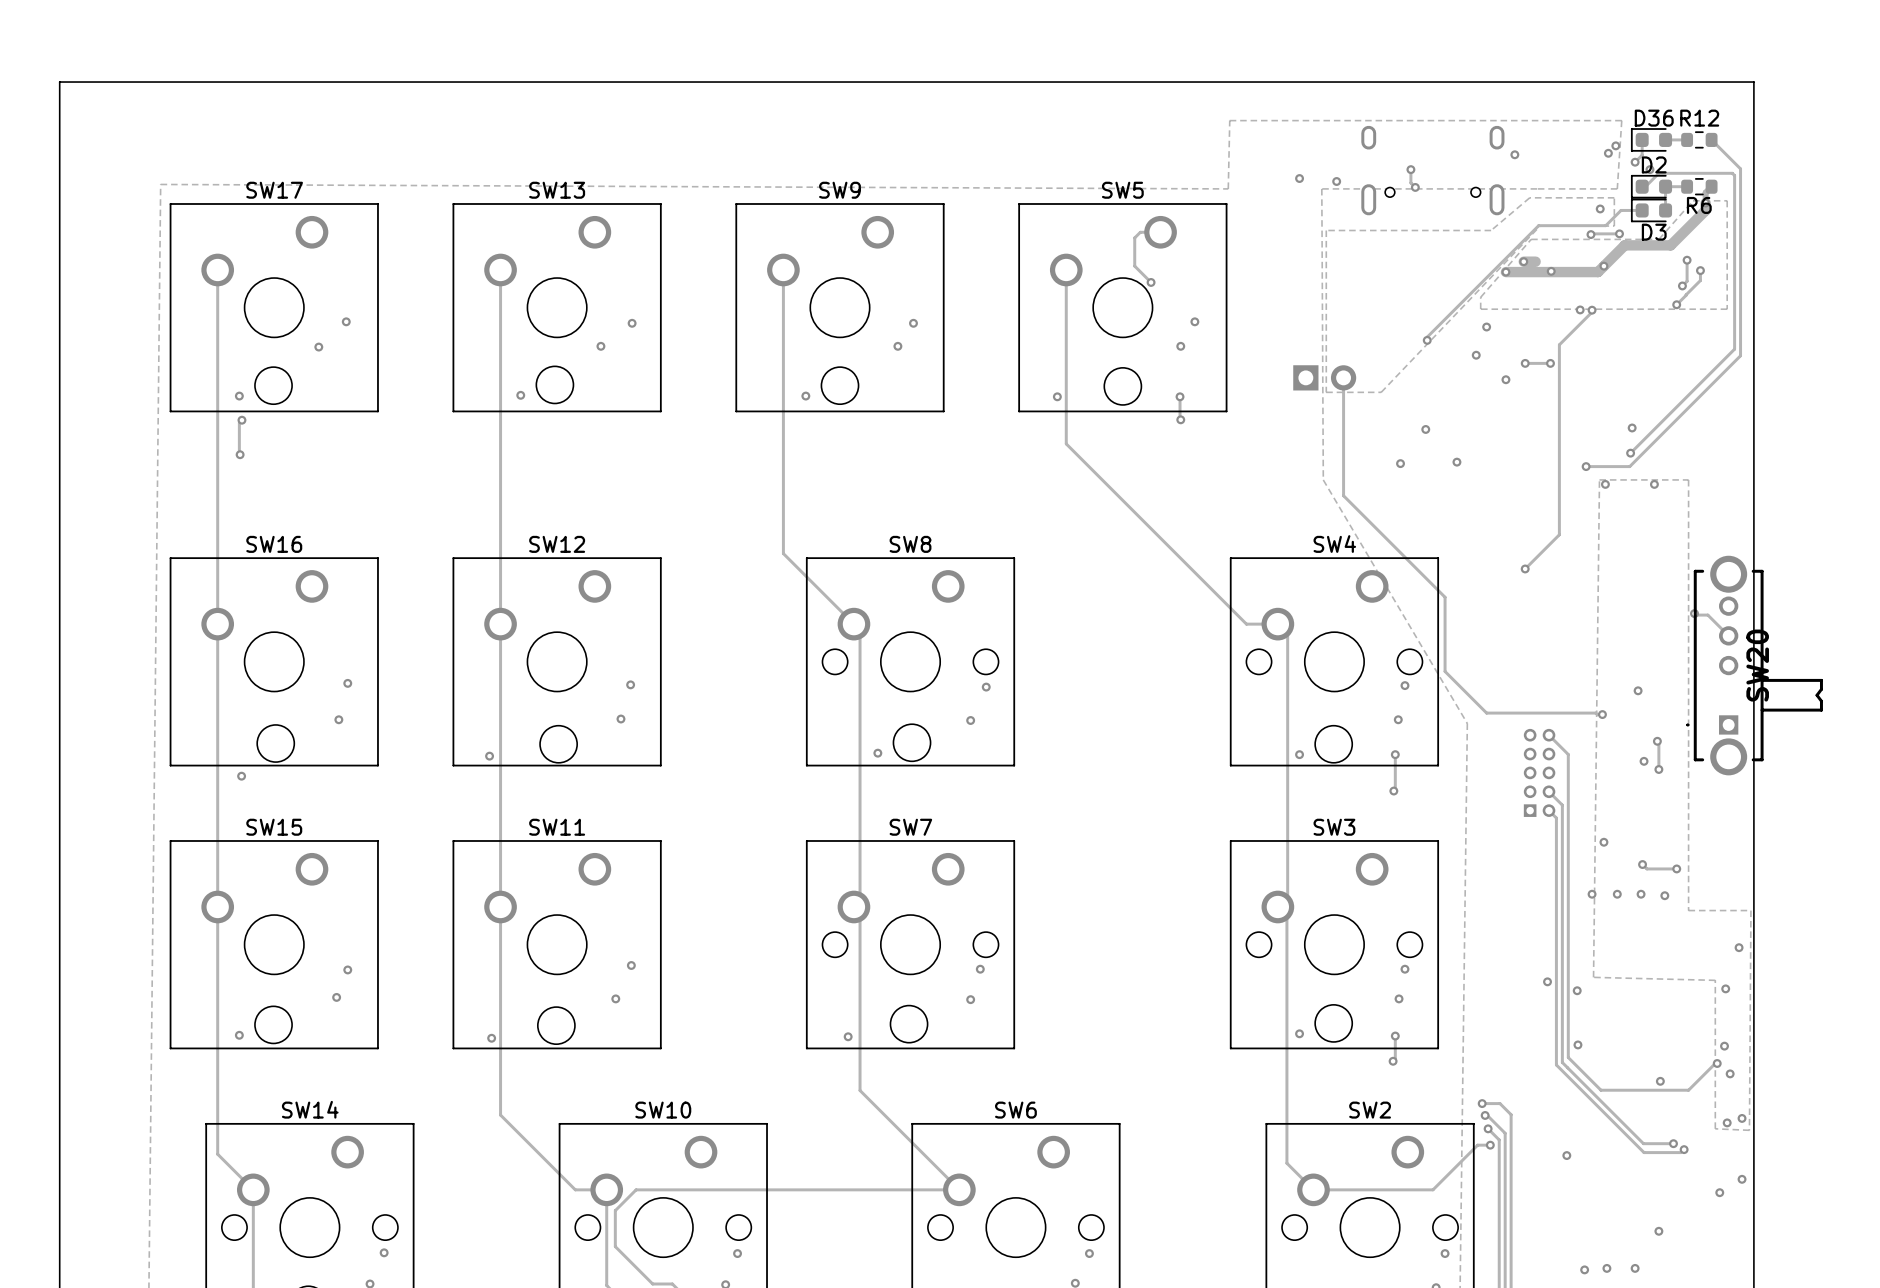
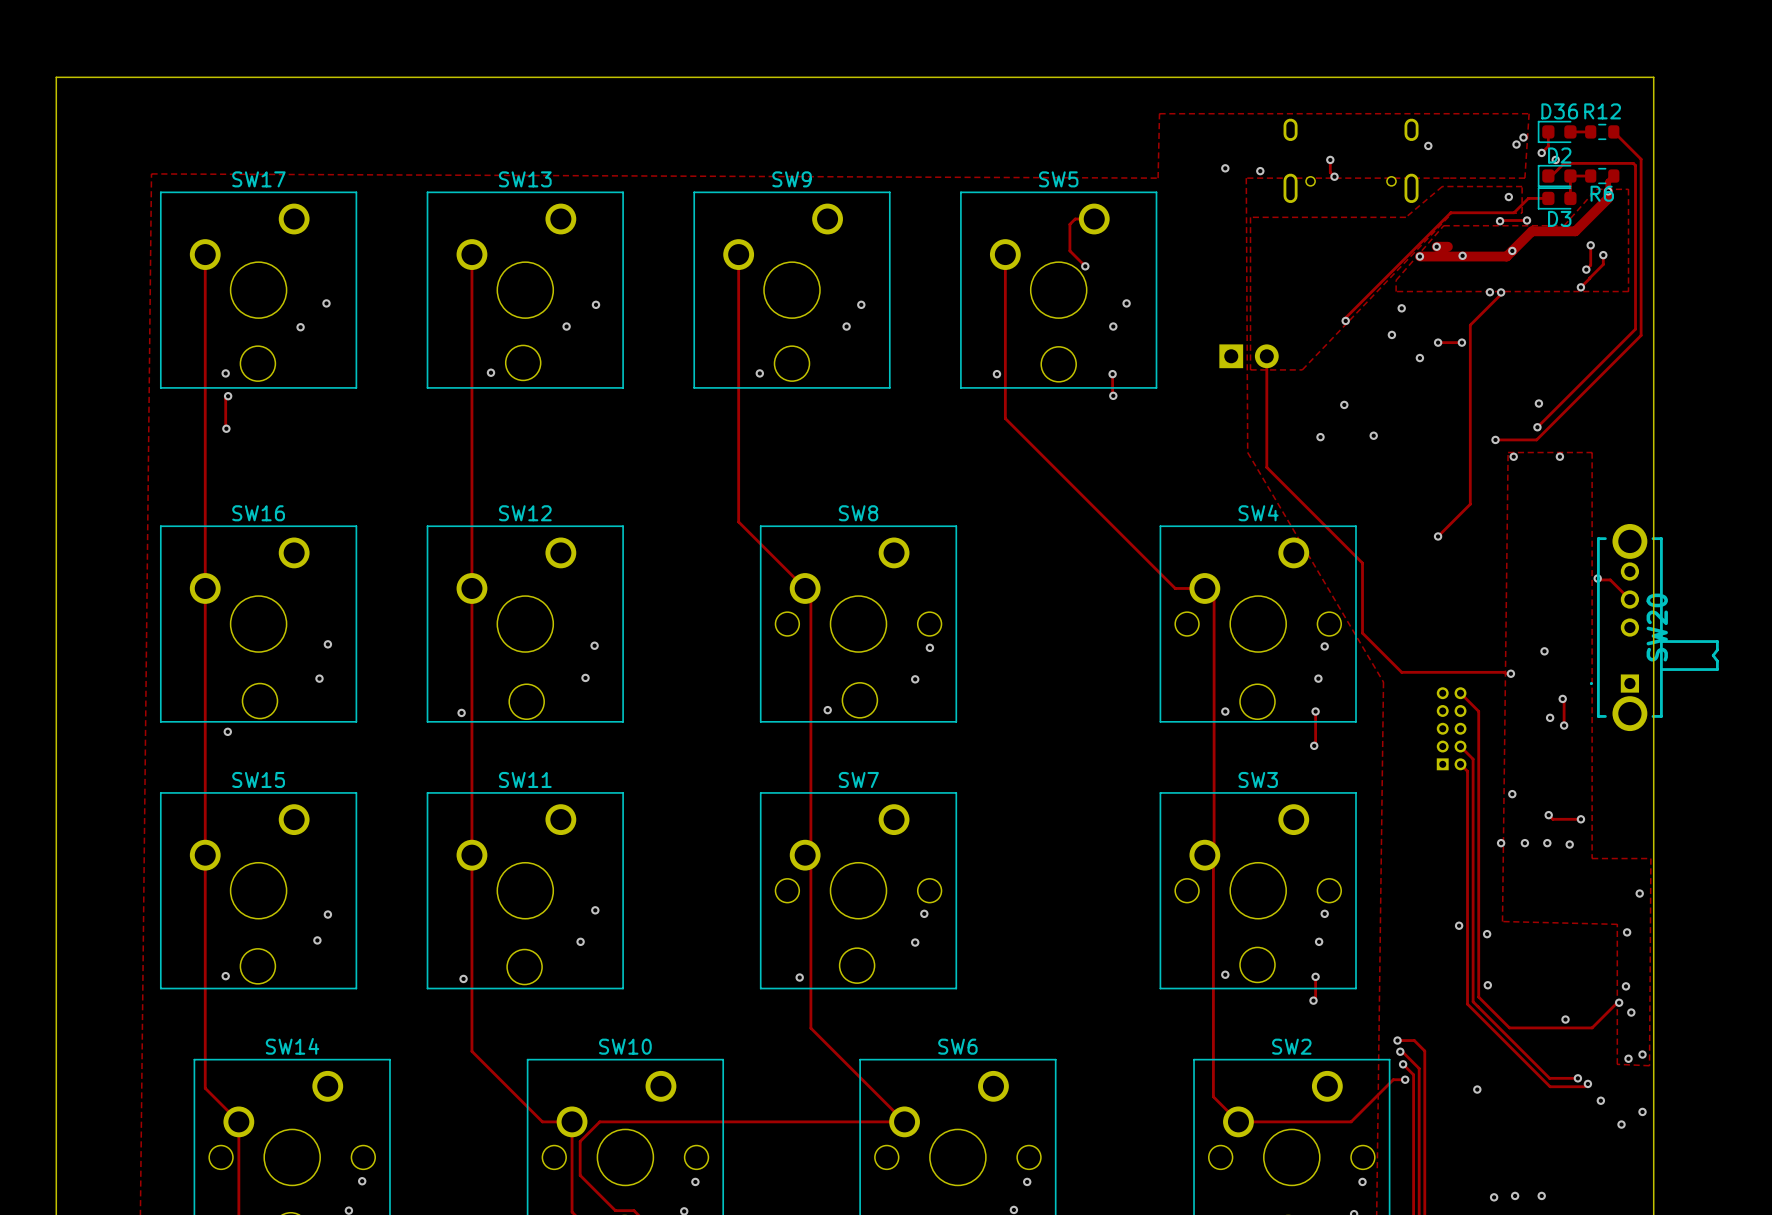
via position: (1658, 1231) -> (1600, 1100)

